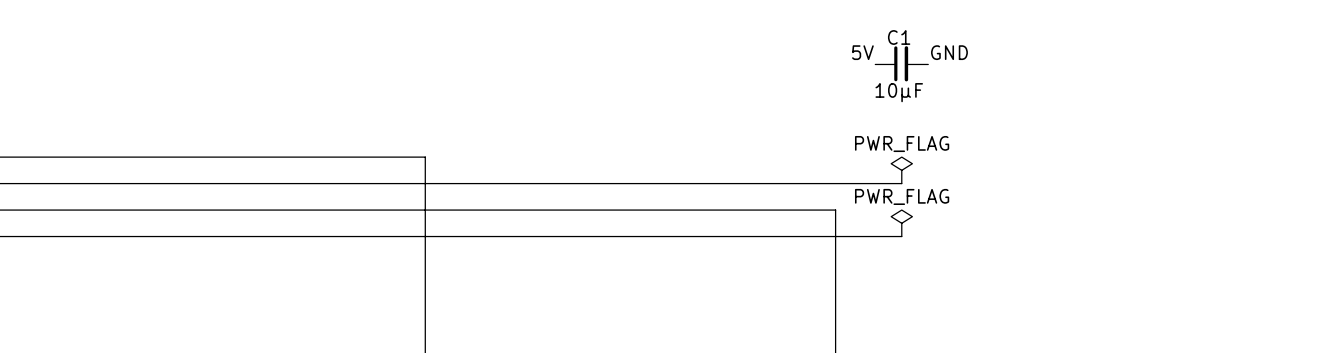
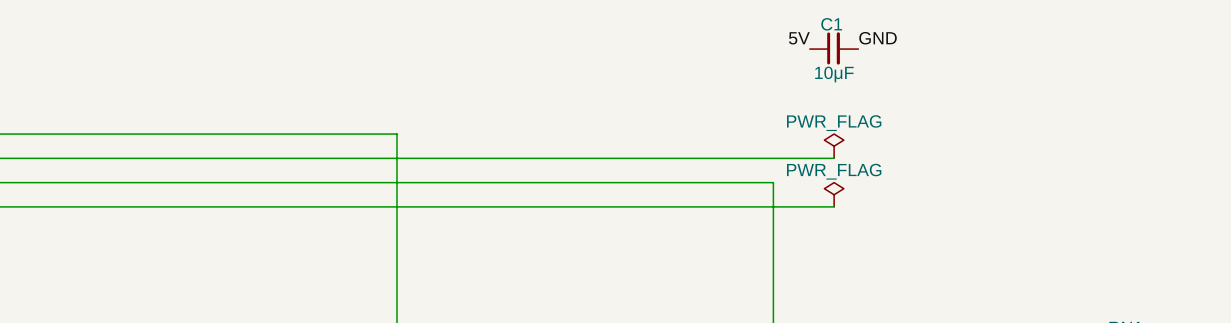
C1 value: 10μF (899, 92) -> none
C1 text: none -> 10μF (834, 74)

